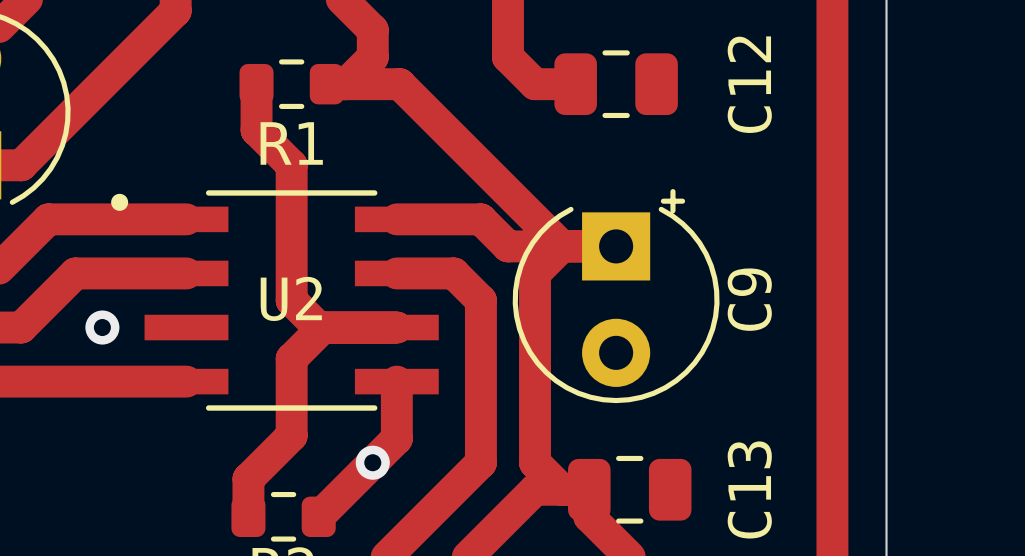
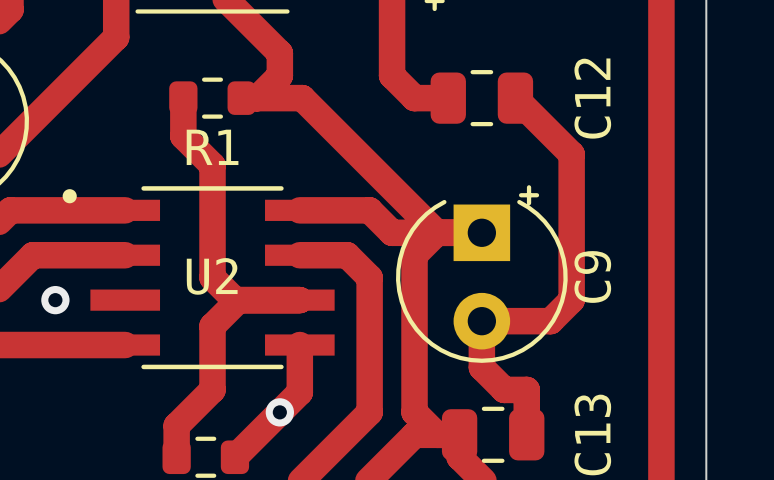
track: none -> (515, 98) (571, 154) (571, 300) (550, 321) (481, 321) (481, 367) (504, 389) (526, 389) (526, 434)

